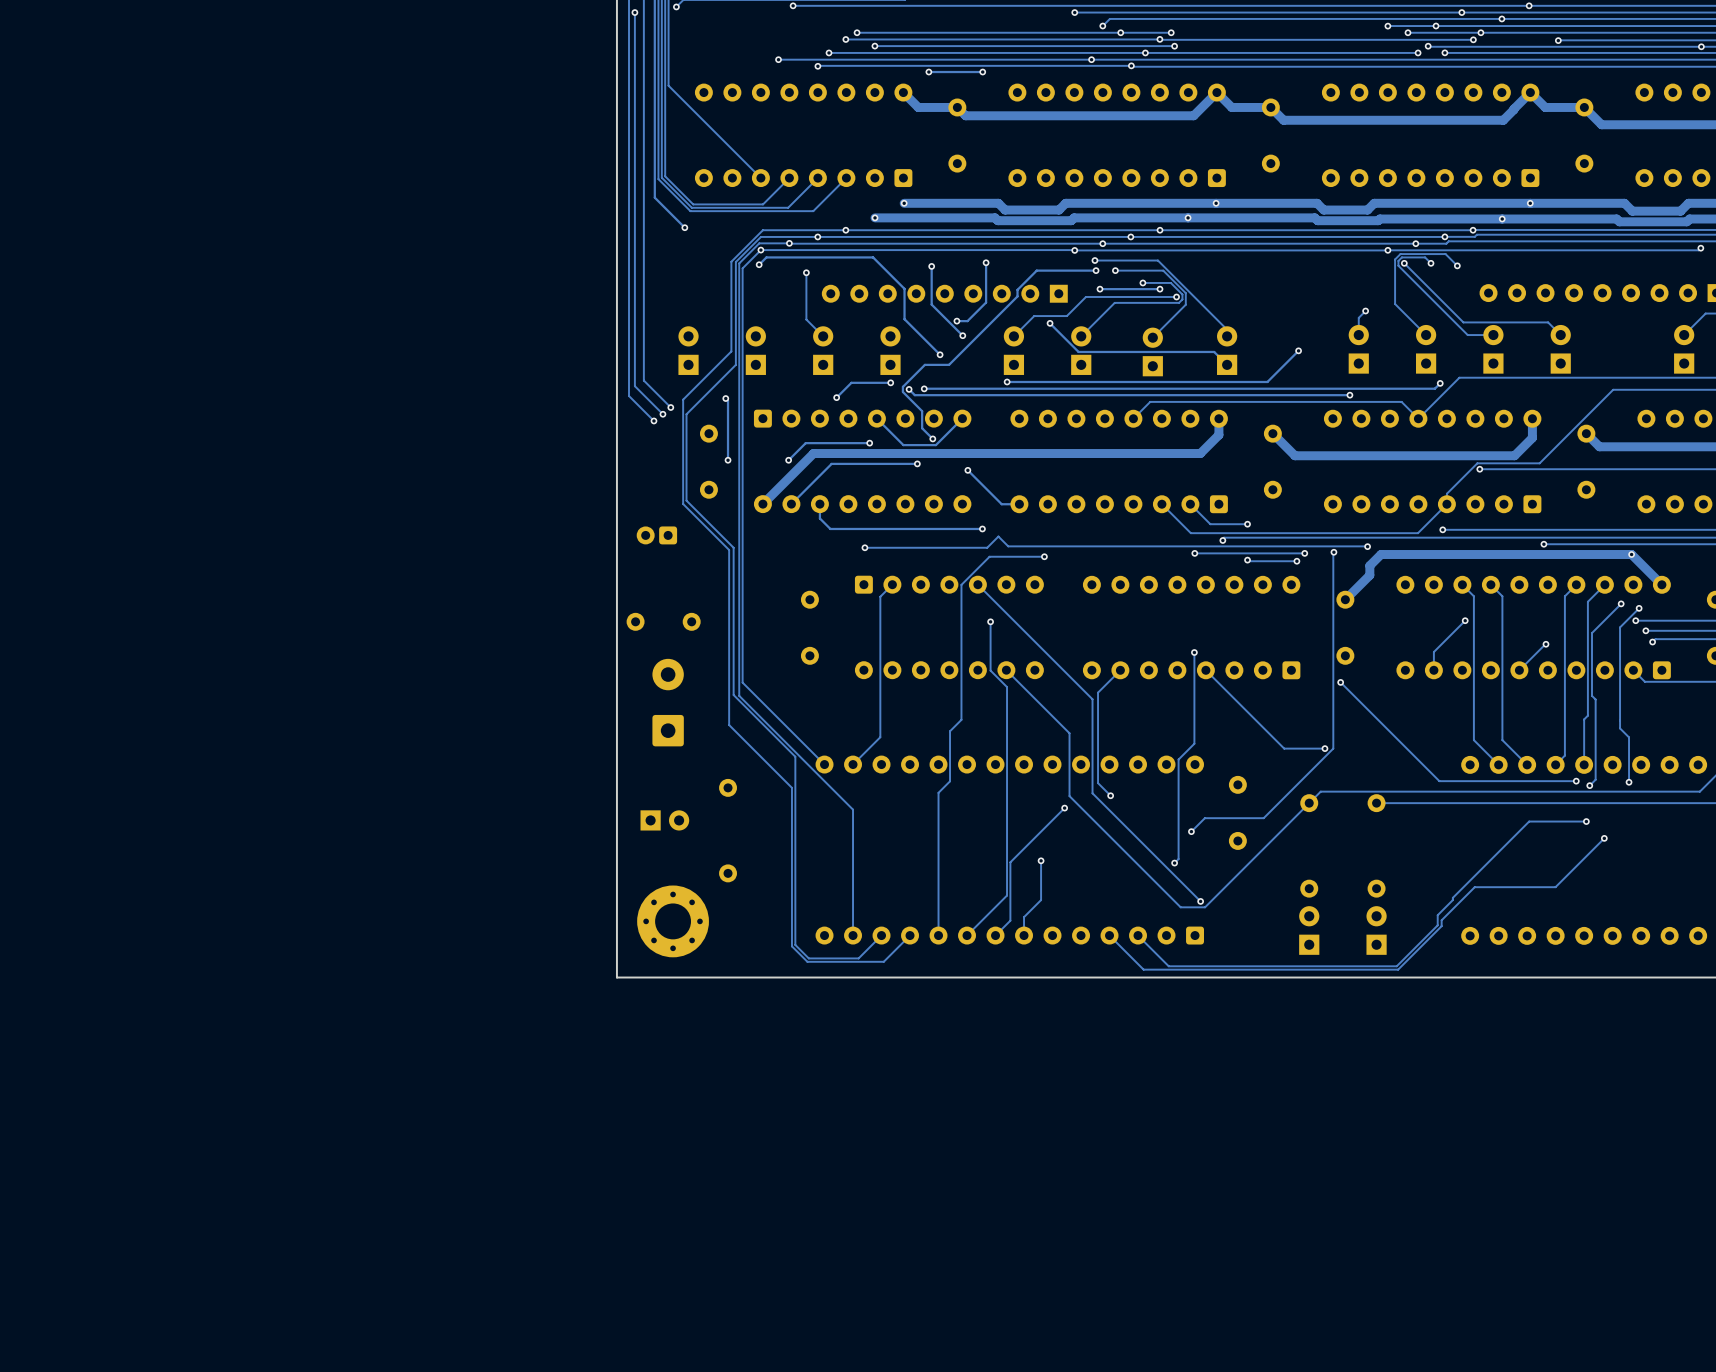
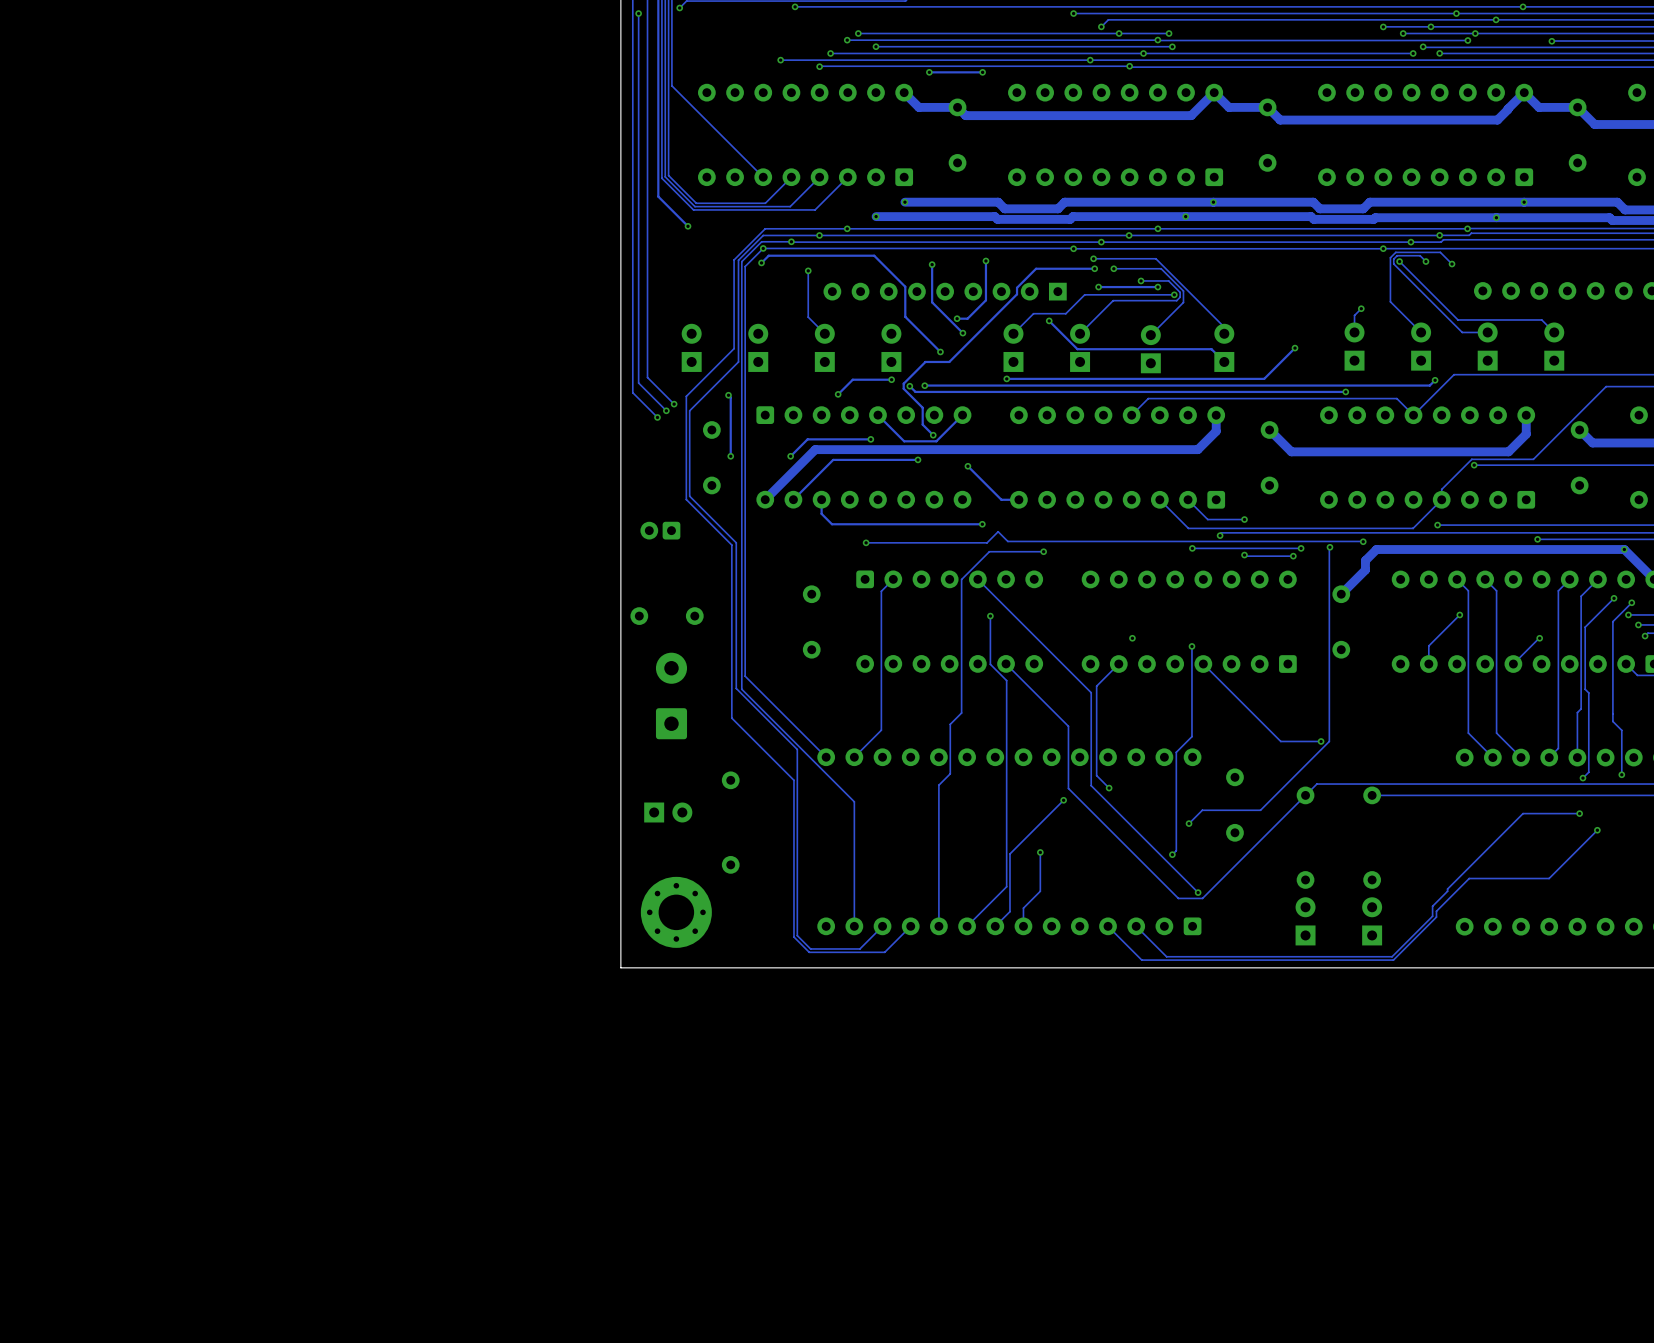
via: none -> (1132, 638)
track: (1340, 682) (1439, 781) (1576, 781) -> none
via: (1340, 682) -> none
via: (1576, 781) -> none

